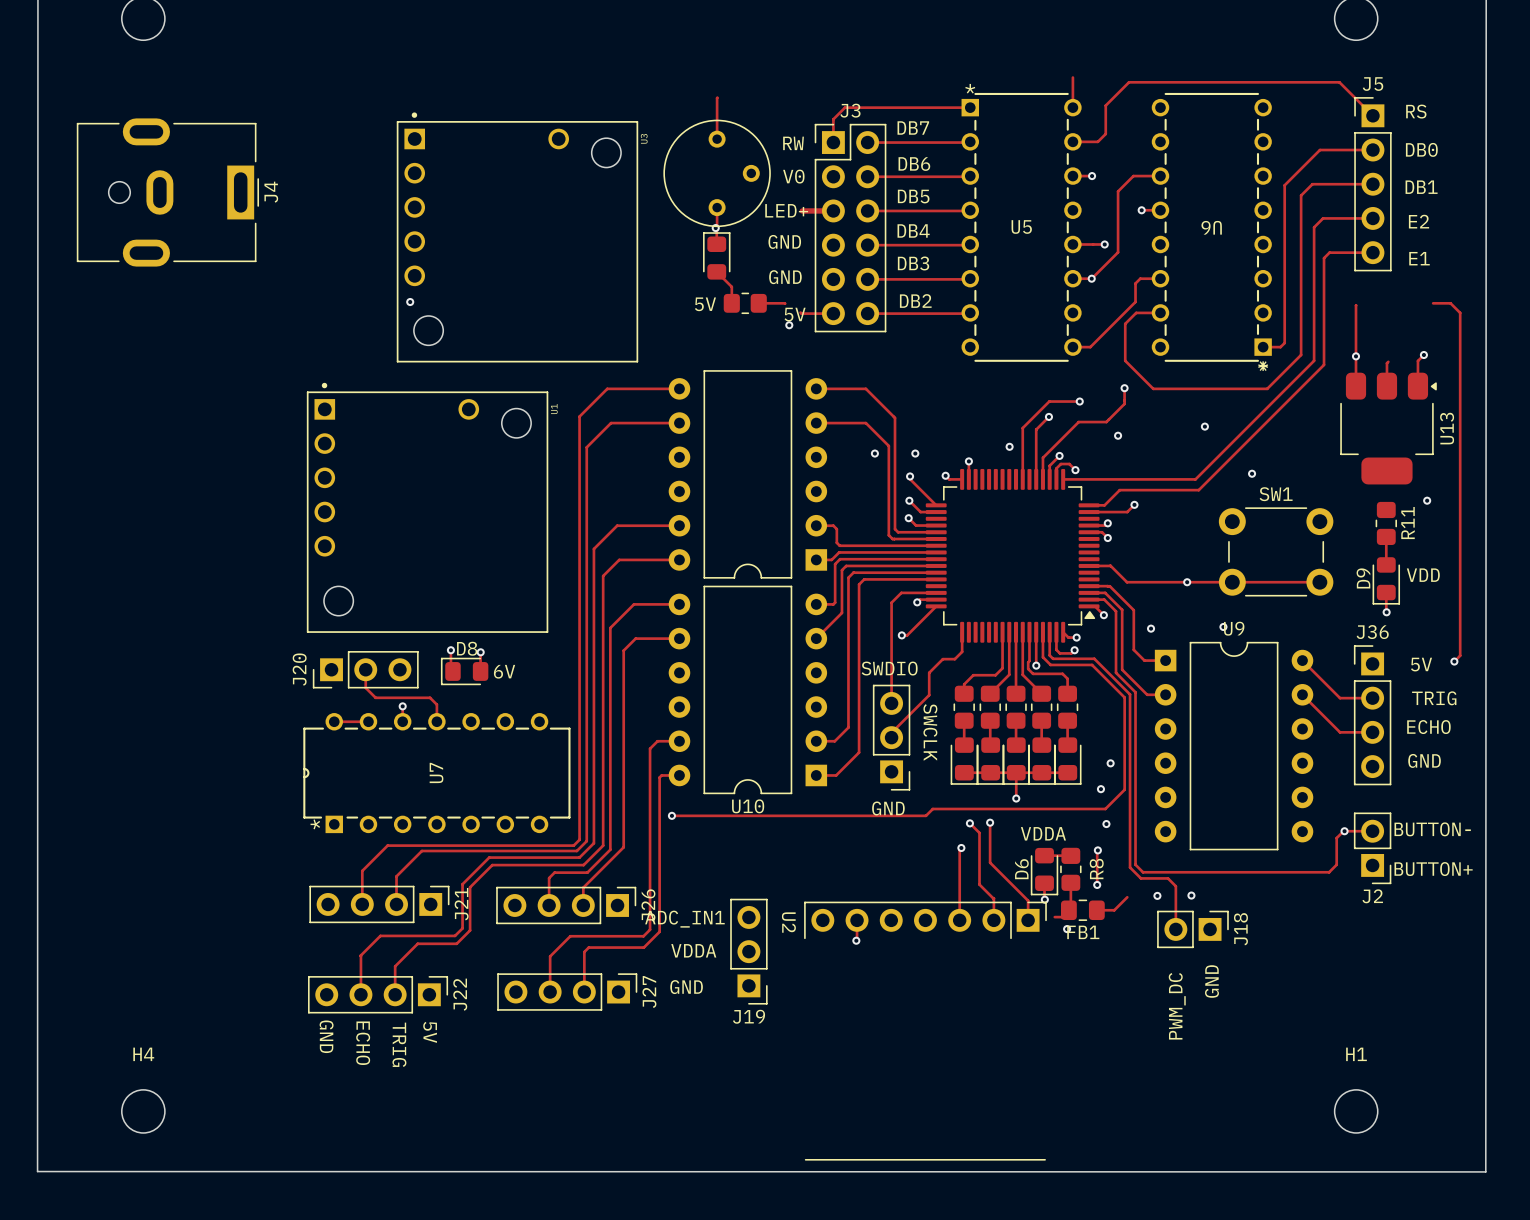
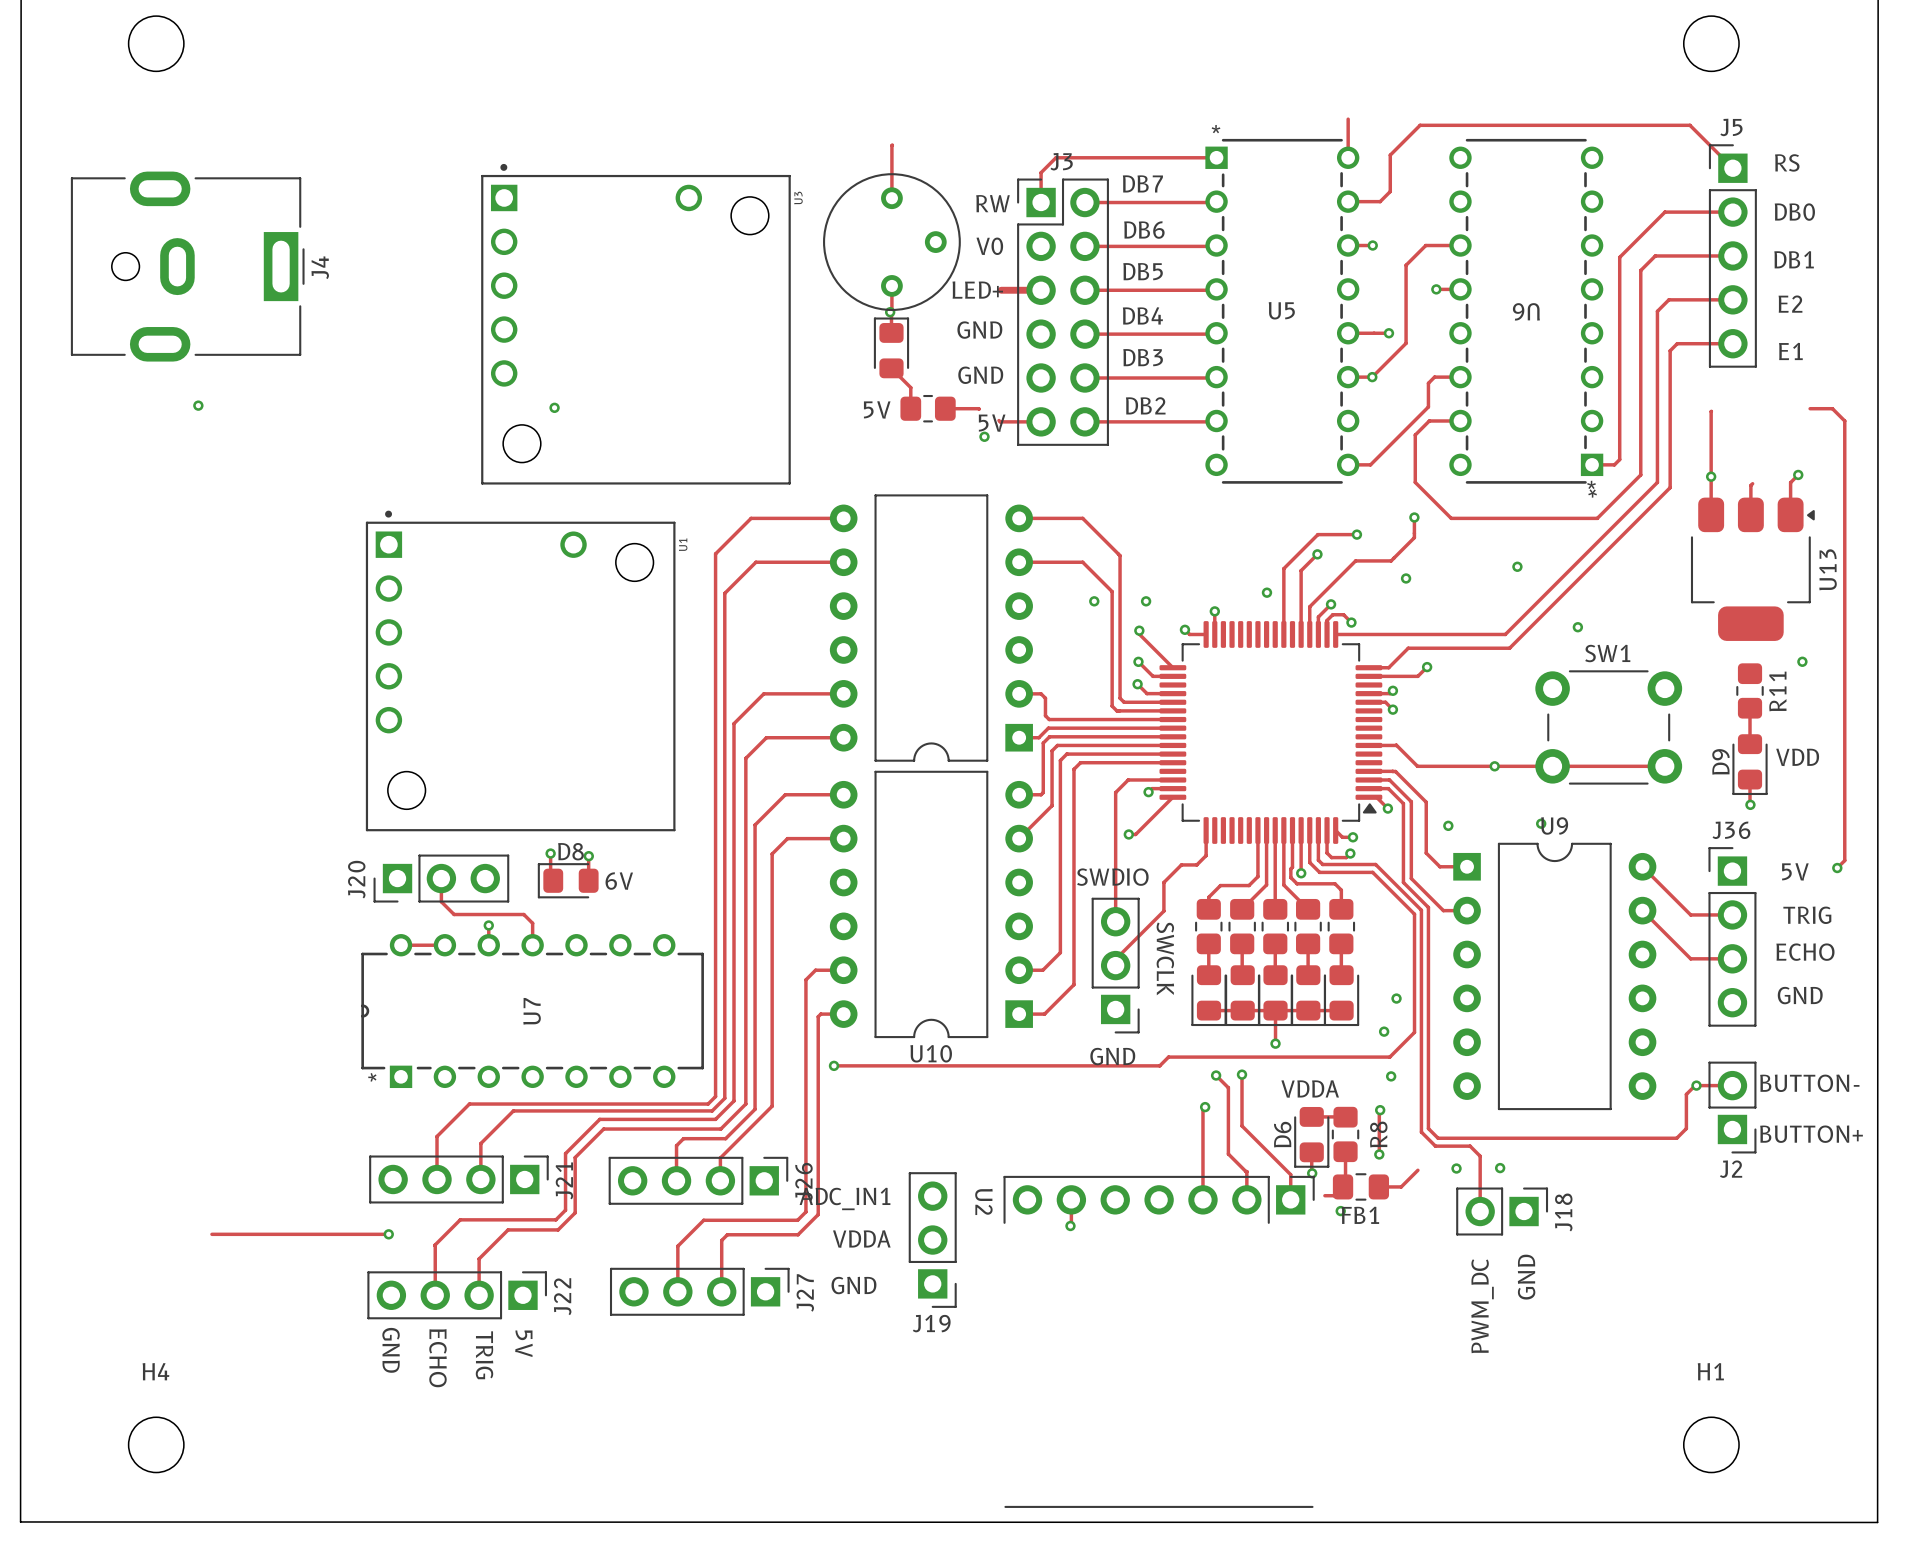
via: none -> (198, 405)
via position: (410, 302) -> (554, 407)
track: none -> (211, 1234) (388, 1234)
via: none -> (388, 1234)

